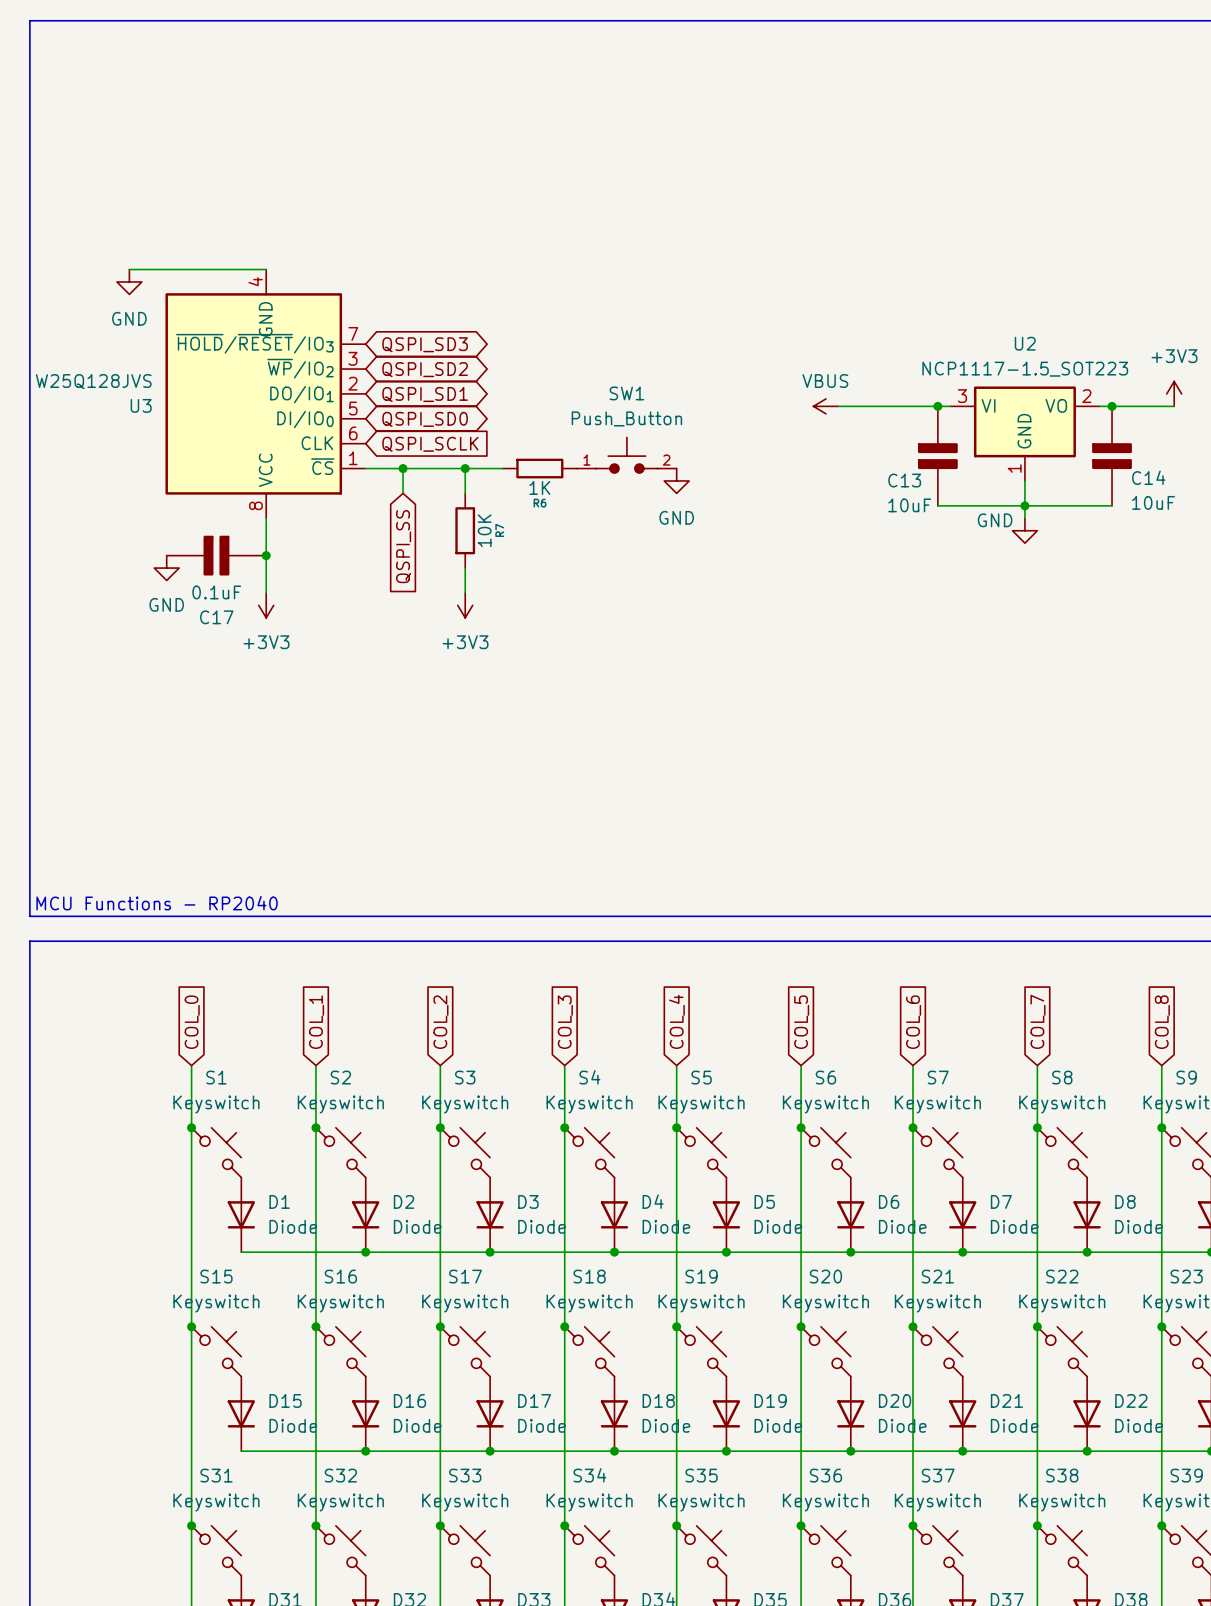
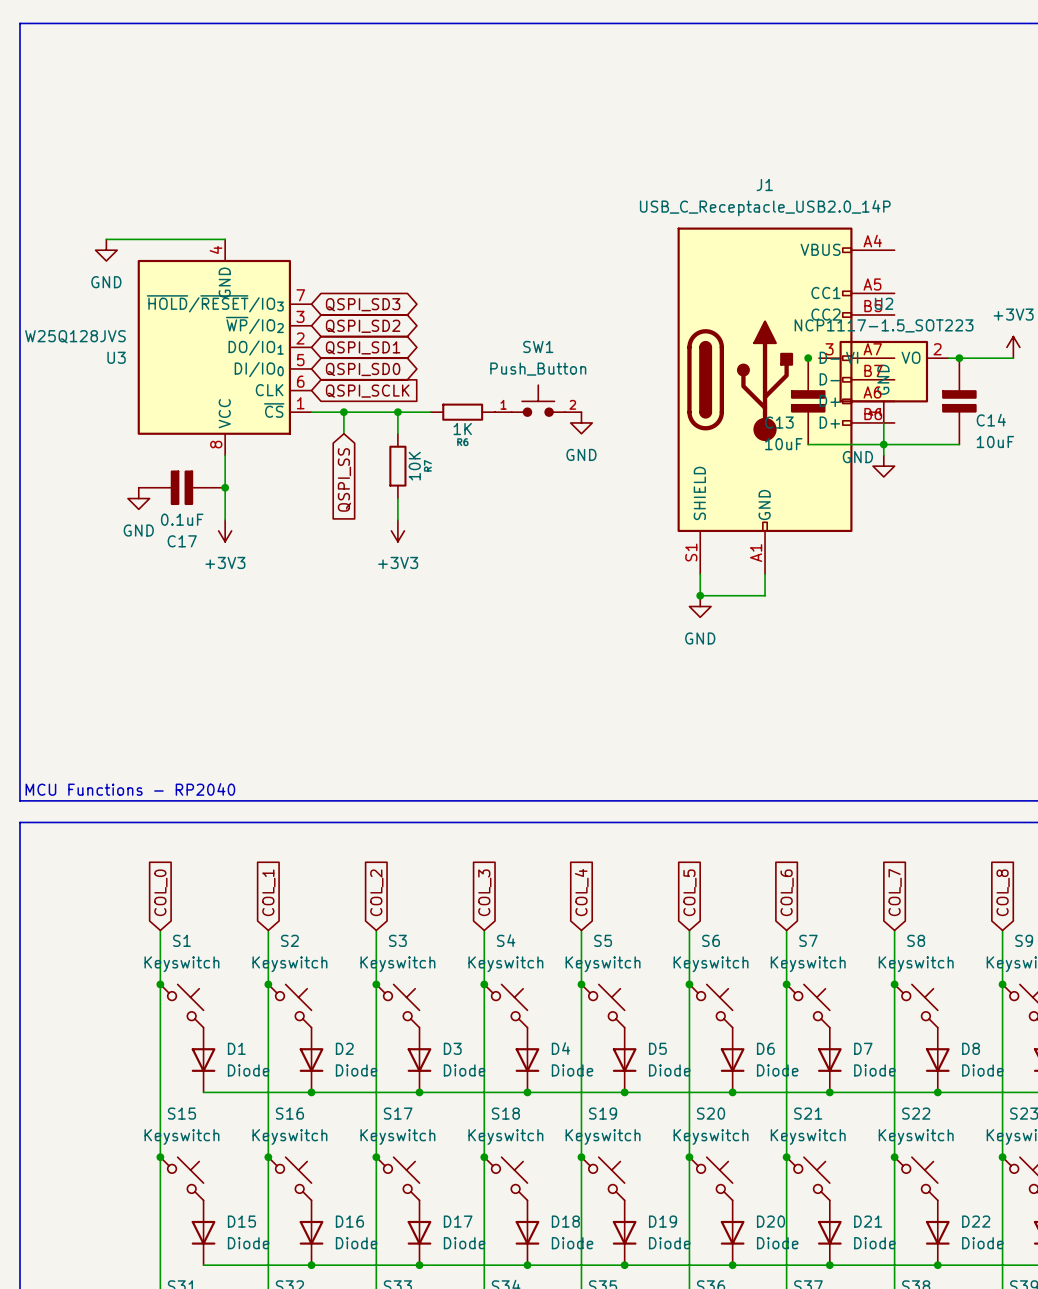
power symbol: VBUS (825, 406) -> none
J1: none -> USB_C_Receptacle_USB2.0_14P (786, 400)
wire: none -> (700, 574) (700, 595) (765, 595) (765, 574)
junction: none -> (700, 595)
power symbol: none -> GND (700, 606)

